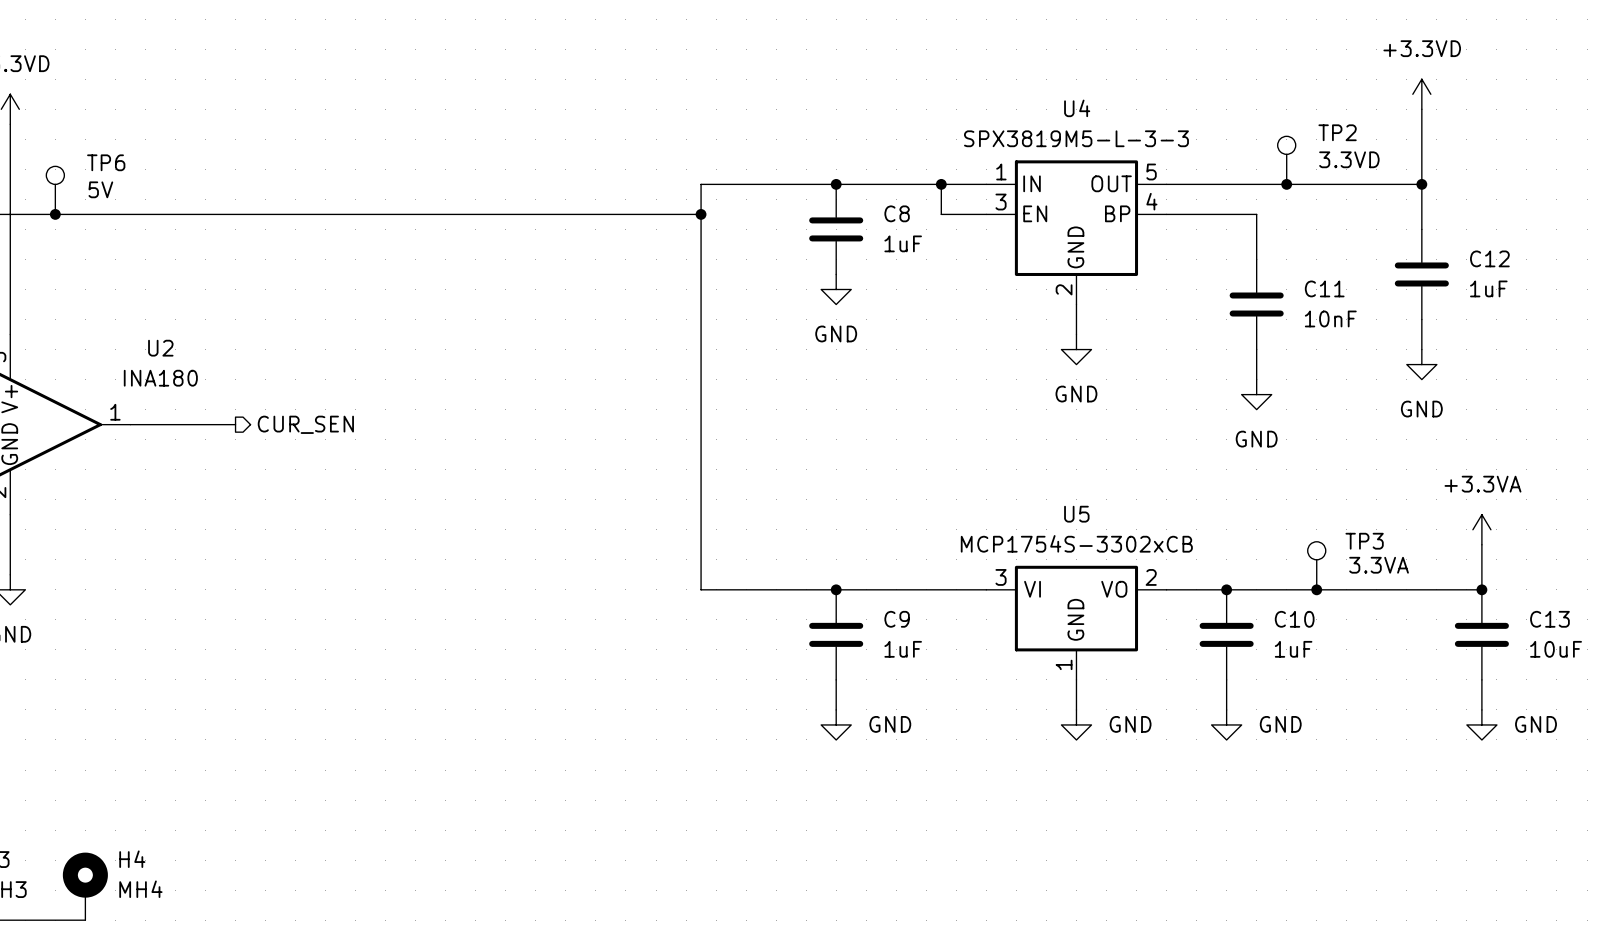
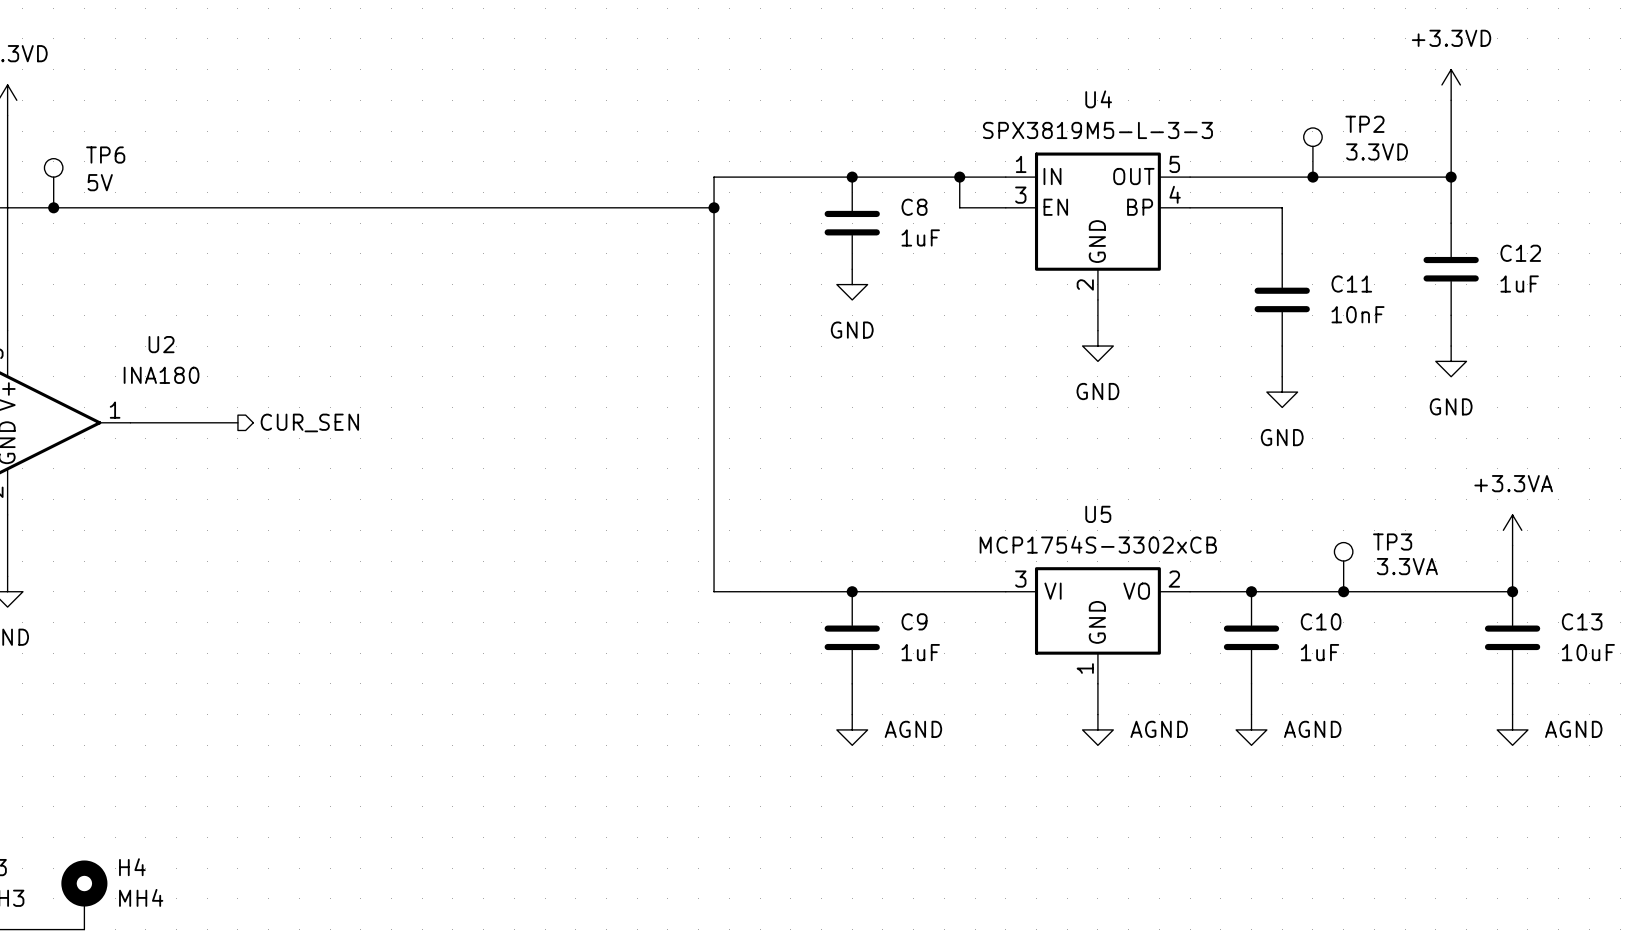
power symbol: GND (836, 724) -> AGND (852, 729)
power symbol: GND (1076, 724) -> AGND (1097, 729)
power symbol: GND (1226, 724) -> AGND (1251, 729)
power symbol: GND (1481, 724) -> AGND (1512, 729)

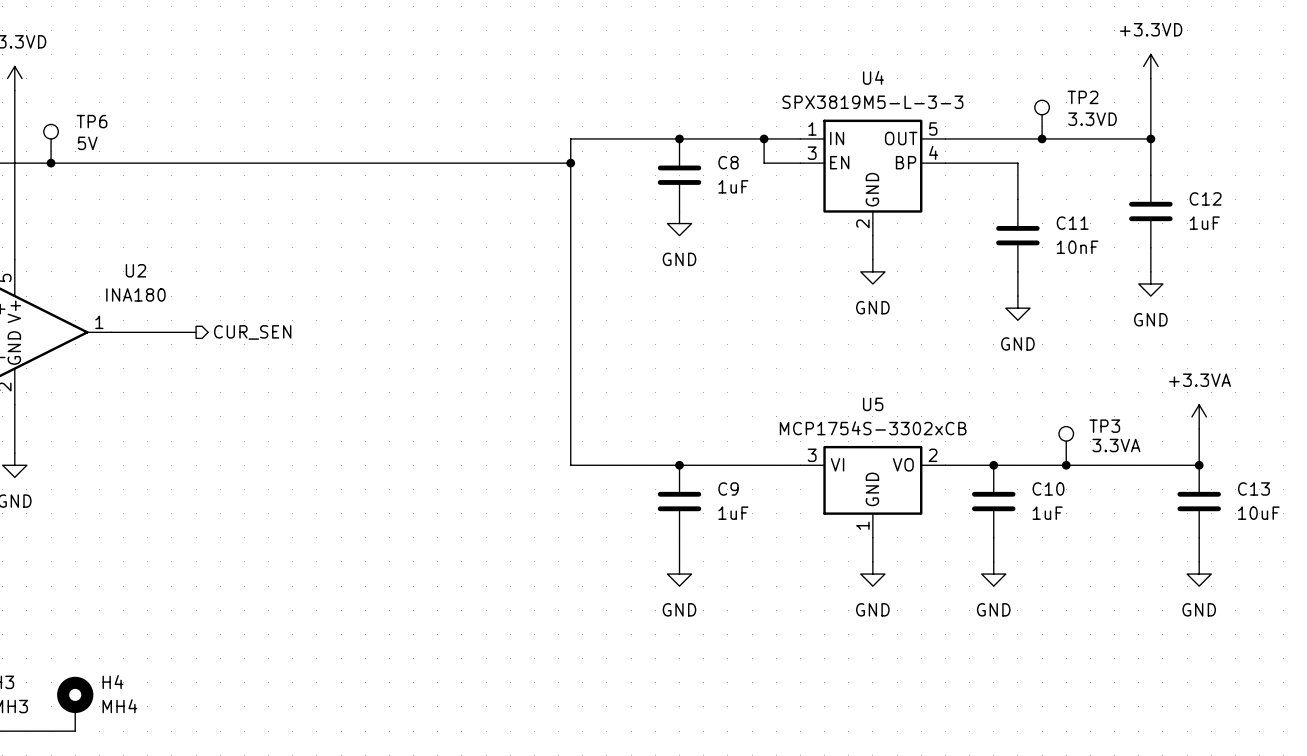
power symbol: AGND (852, 729) -> GND (679, 574)
power symbol: AGND (1097, 729) -> GND (872, 574)
power symbol: AGND (1251, 729) -> GND (993, 574)
power symbol: AGND (1512, 729) -> GND (1199, 574)

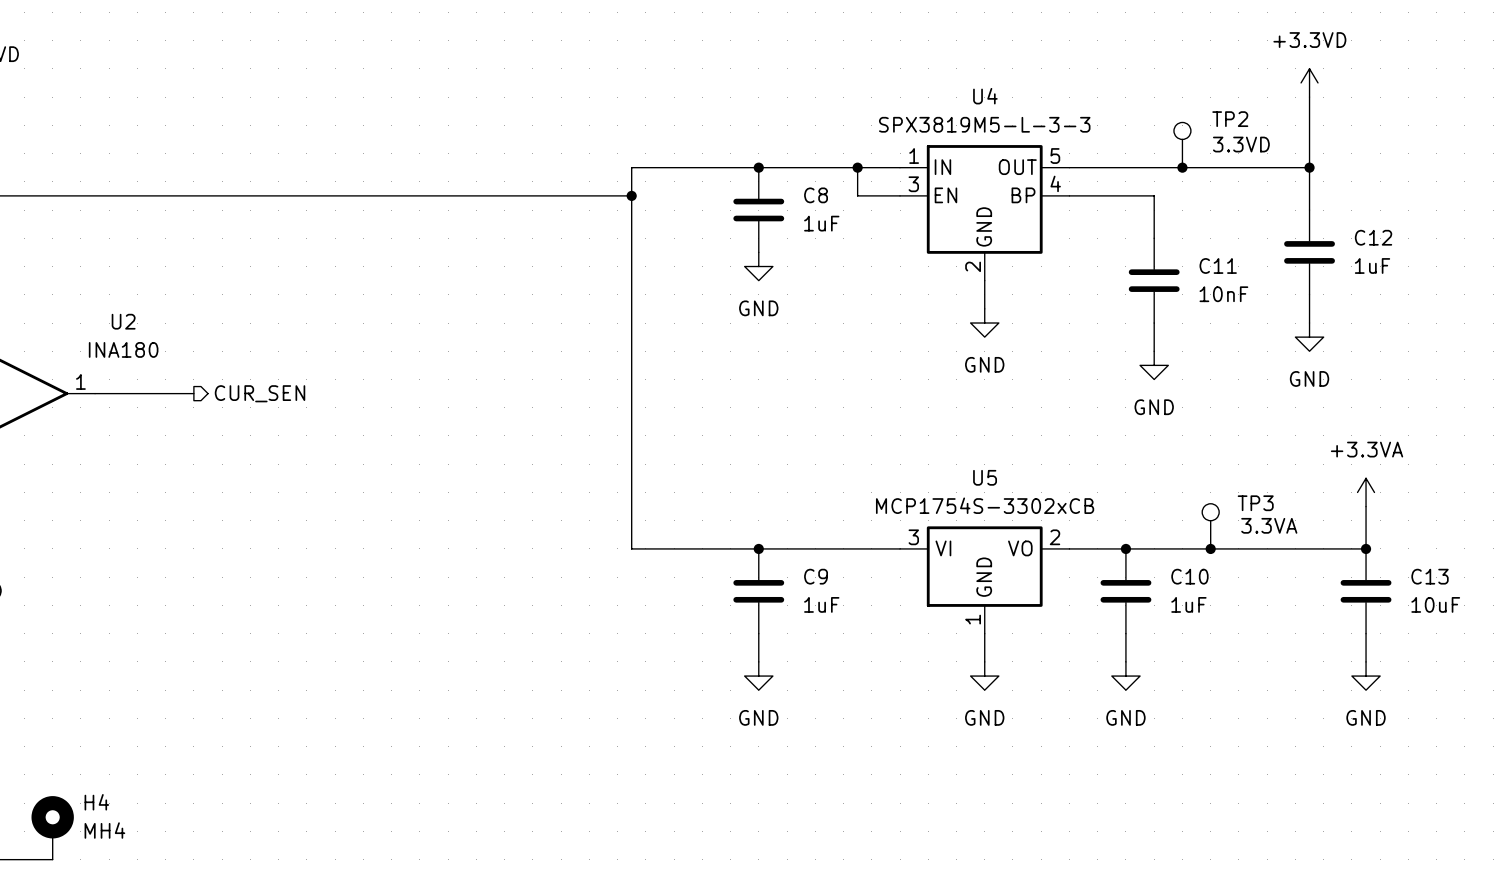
TP6: 5V (51, 143) -> none
junction: (51, 163) -> none

